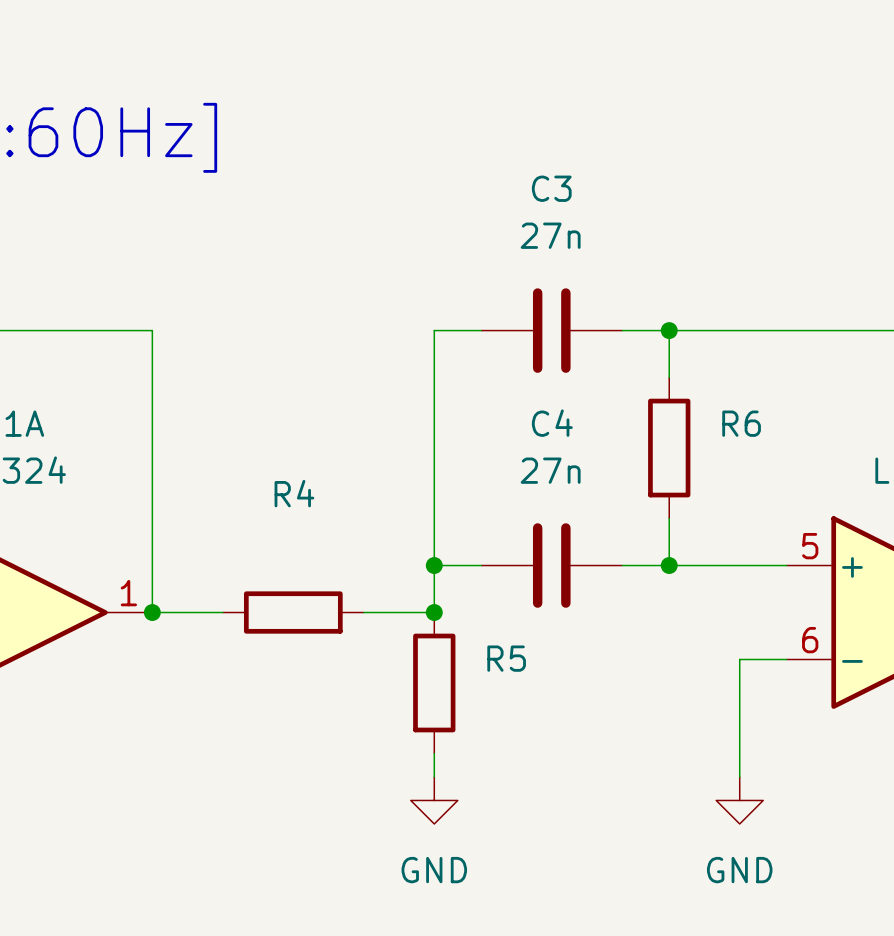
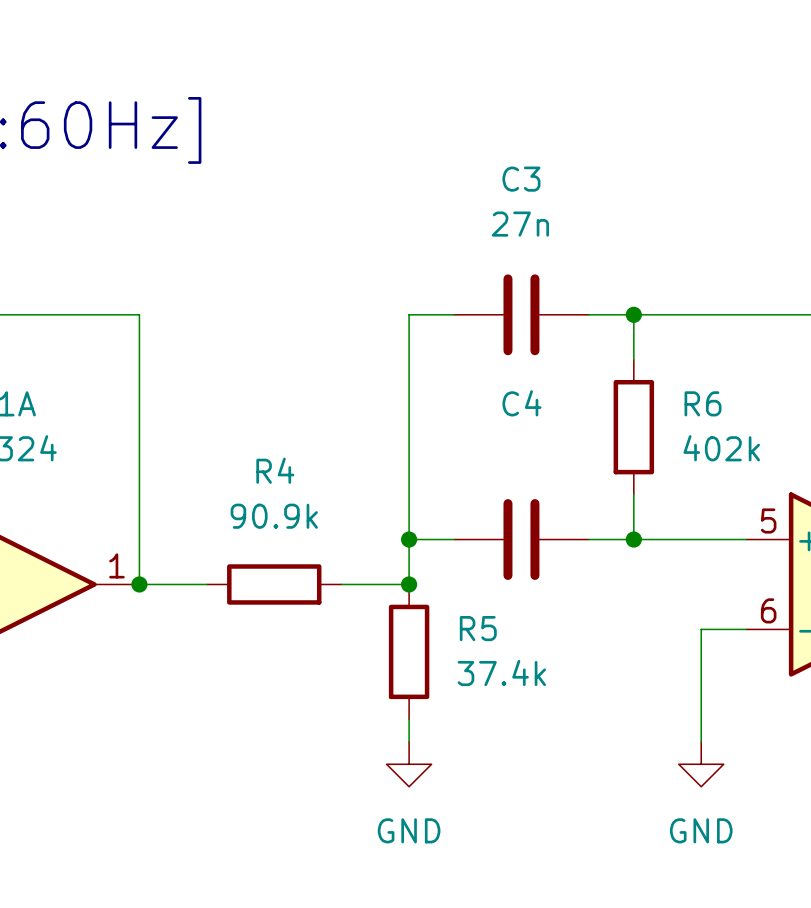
C4 value: 27n (550, 470) -> none
R6 value: none -> 402k (721, 448)
R4 value: none -> 90.9k (274, 516)
R5 value: none -> 37.4k (501, 672)

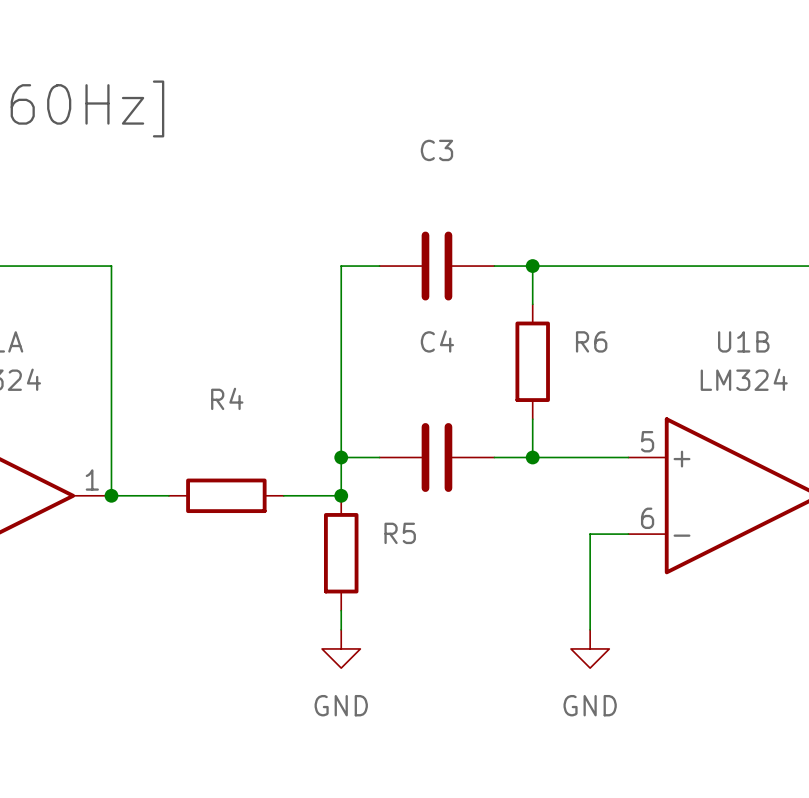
C3 value: 27n (520, 224) -> none
R6 value: 402k (721, 448) -> none
R4 value: 90.9k (274, 516) -> none
R5 value: 37.4k (501, 672) -> none

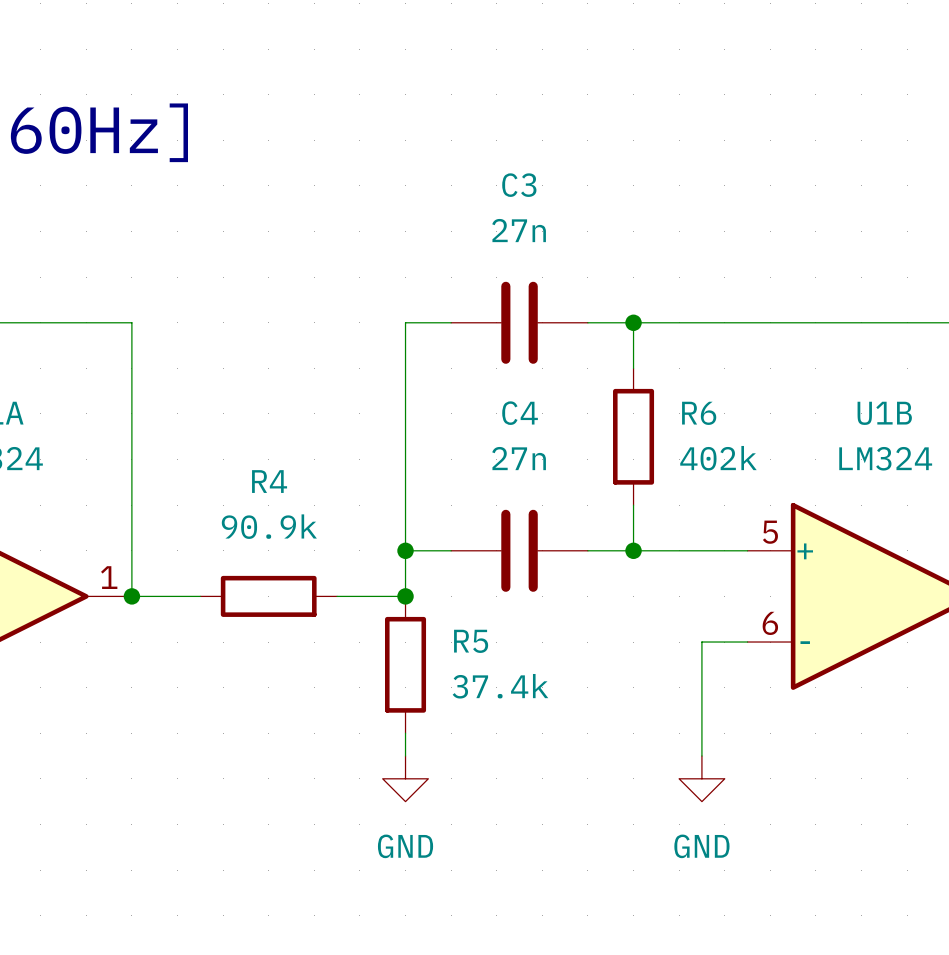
C3 value: none -> 27n (519, 230)
R6 value: none -> 402k (718, 458)
C4 value: none -> 27n (519, 458)
R4 value: none -> 90.9k (269, 526)
R5 value: none -> 37.4k (500, 686)

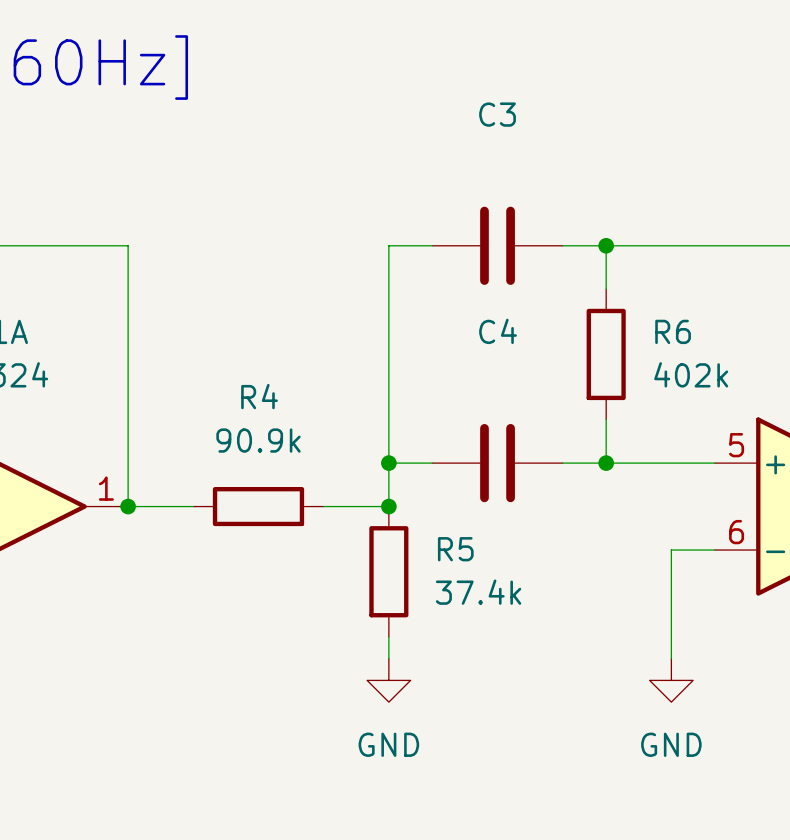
C3 value: 27n (519, 230) -> none
C4 value: 27n (519, 458) -> none

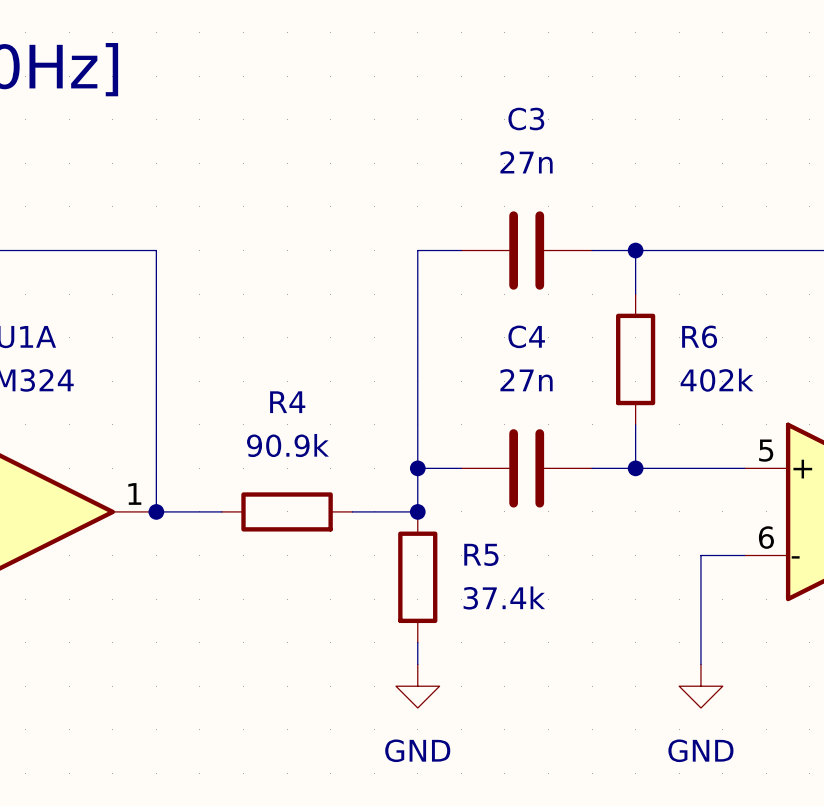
C3 value: none -> 27n (526, 162)
C4 value: none -> 27n (526, 380)

